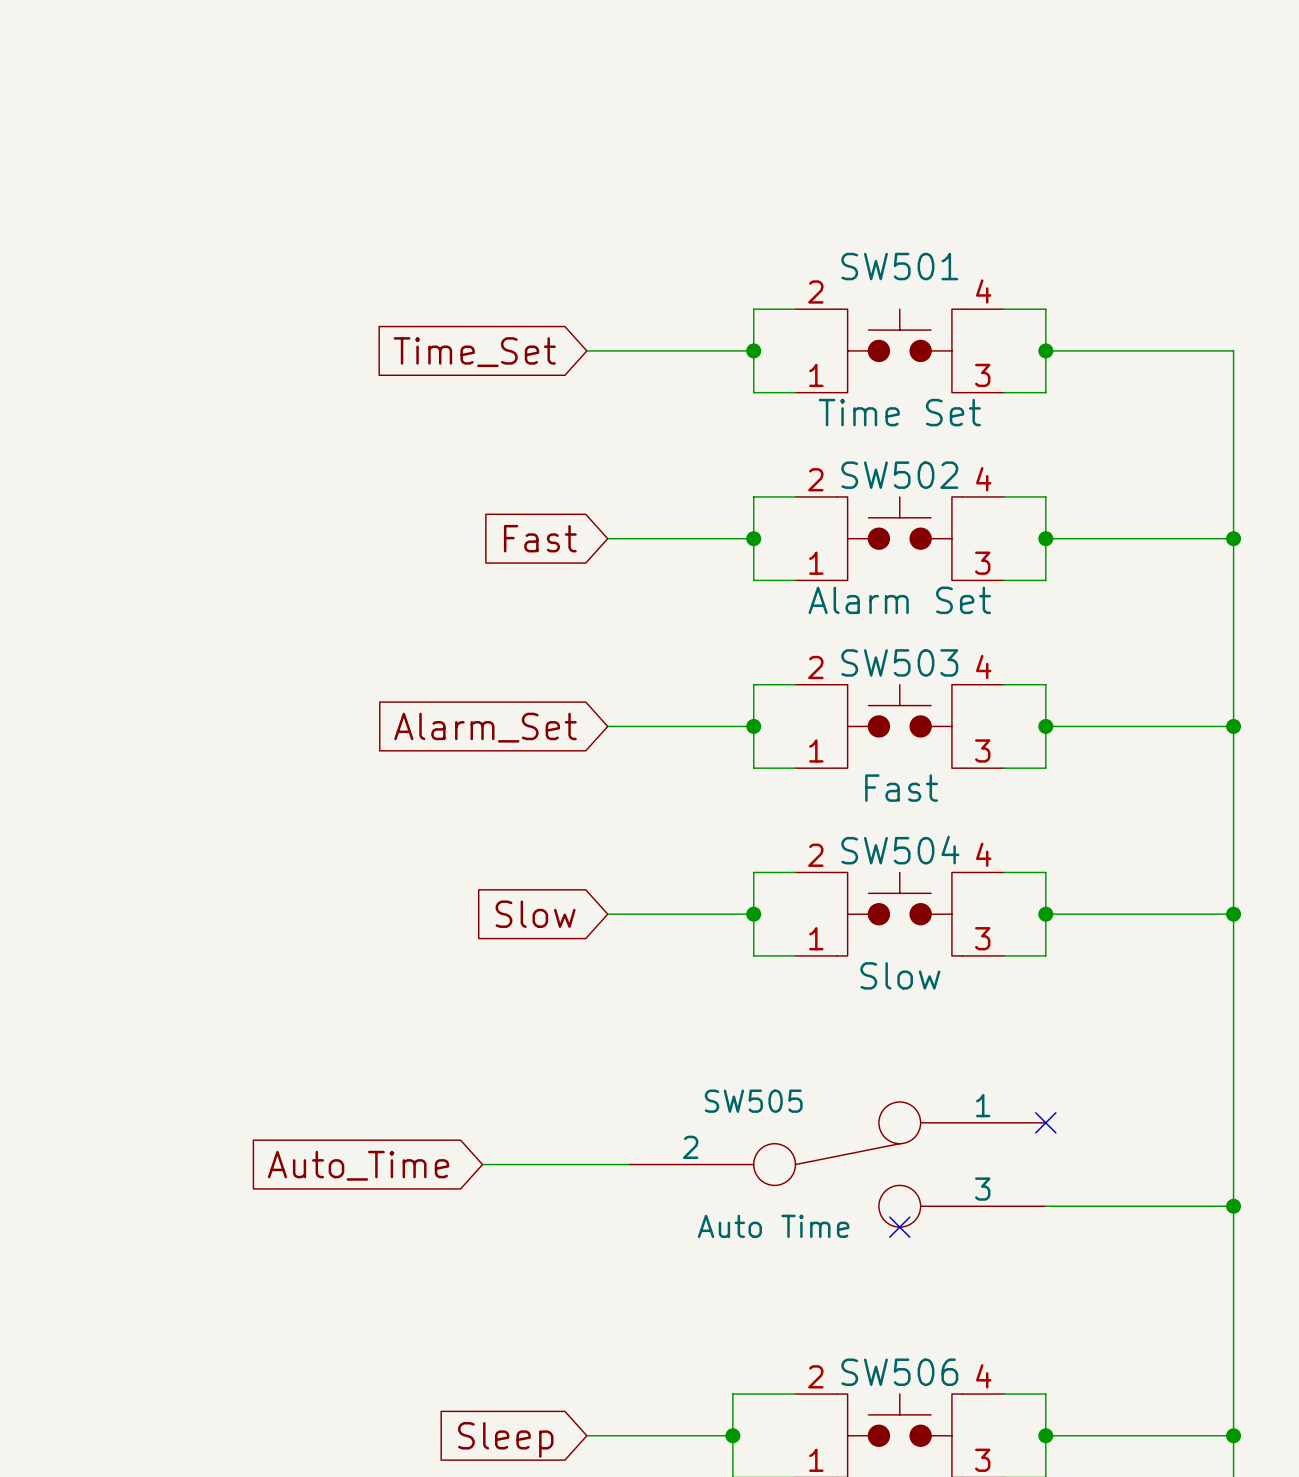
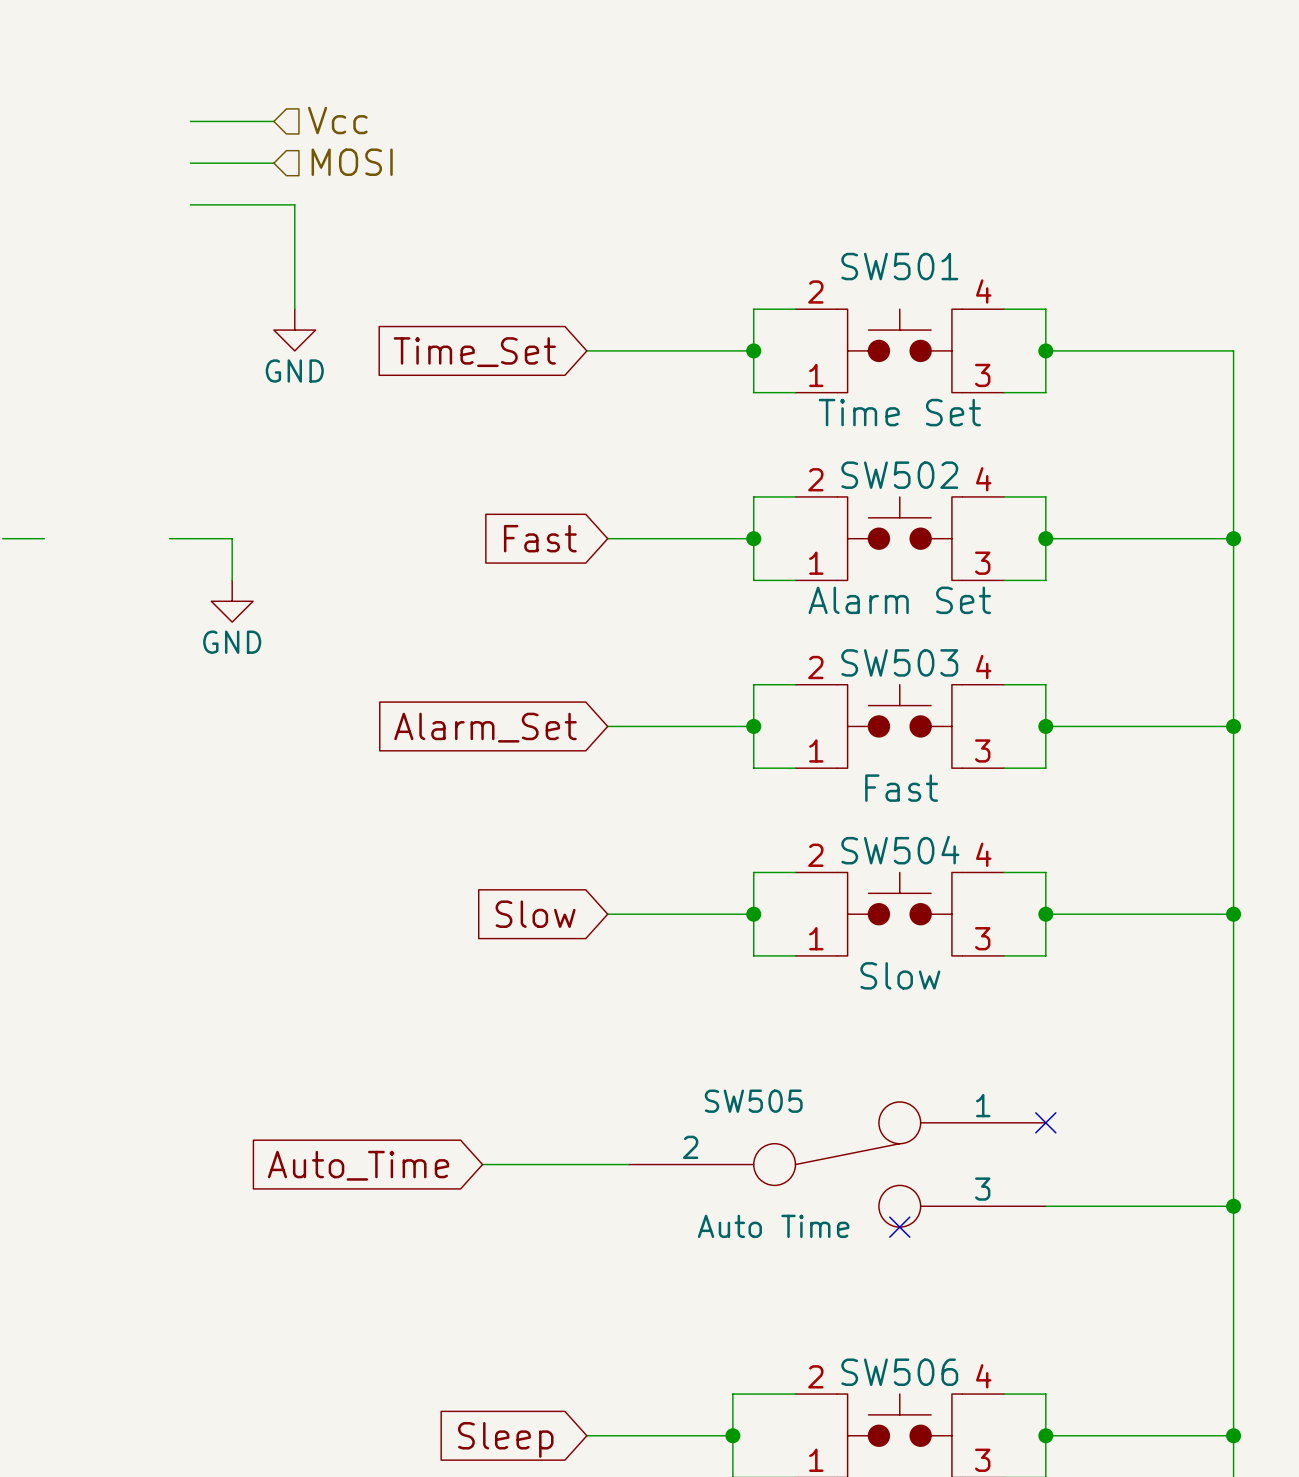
hierarchical label: none -> Vcc (337, 120)
wire: none -> (190, 121) (273, 121)
hierarchical label: none -> MOSI (352, 162)
wire: none -> (190, 163) (273, 163)
wire: none -> (190, 204) (294, 204) (294, 309)
power symbol: none -> GND (294, 330)
wire: none -> (2, 538) (44, 538)
wire: none -> (169, 538) (232, 538) (232, 580)
power symbol: none -> GND (232, 601)

